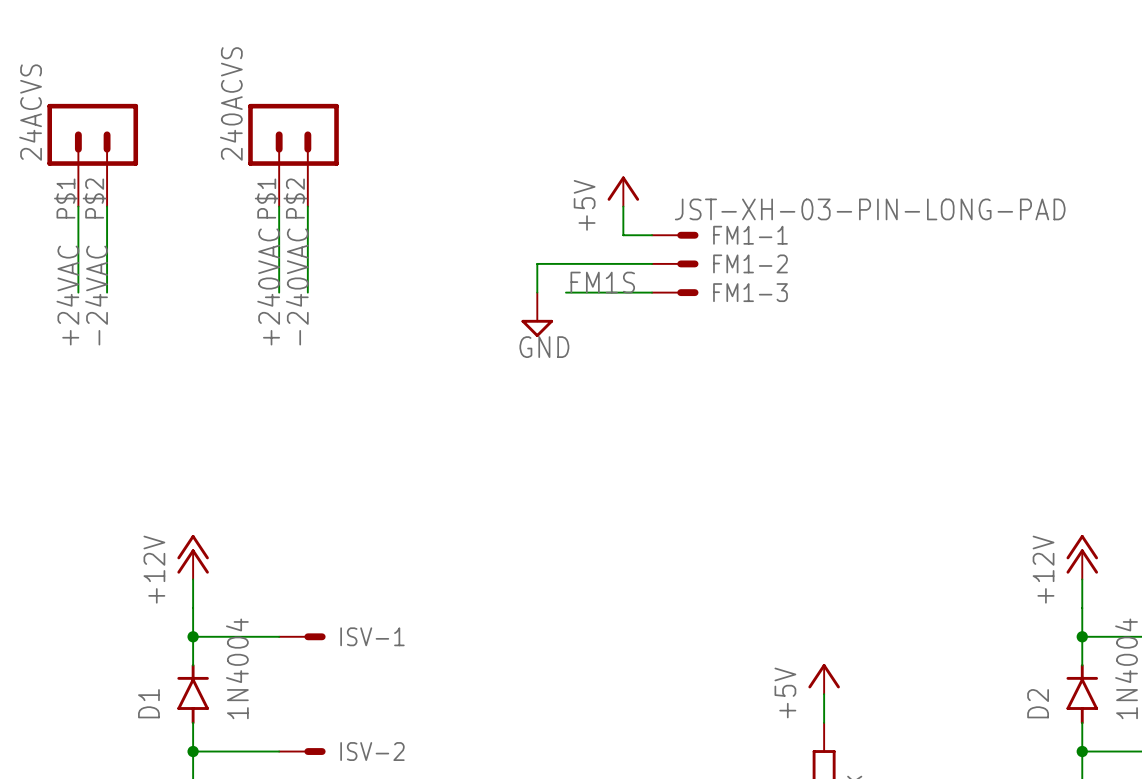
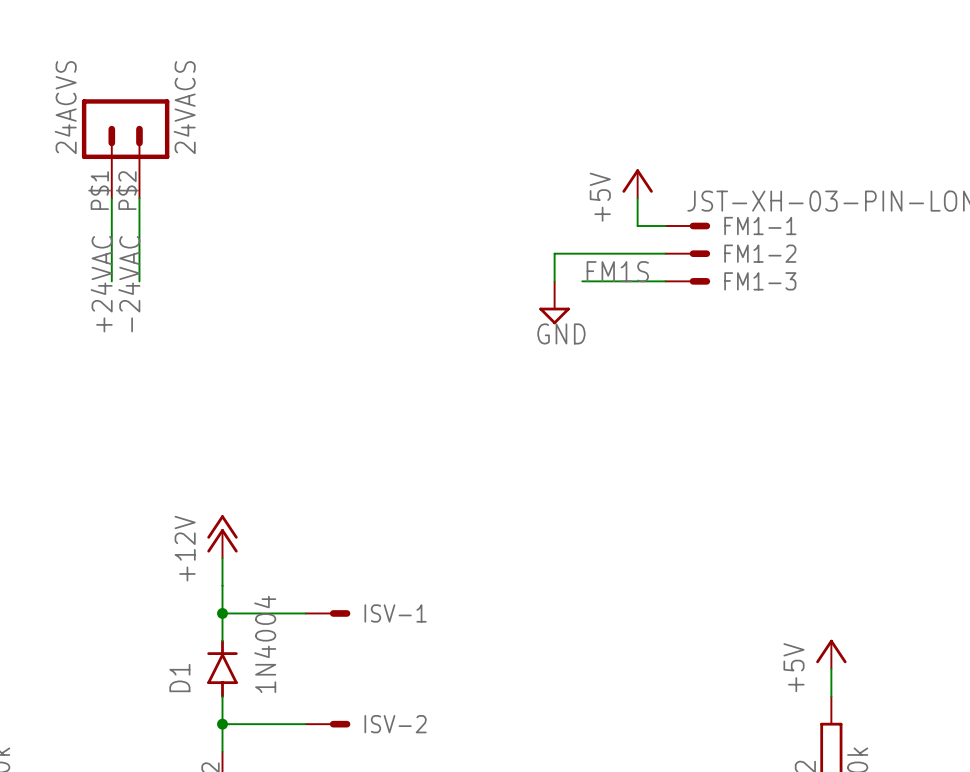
24ACVS value: none -> 24VACS (184, 107)
240ACVS: (293, 155) -> none
wire: (279, 206) (279, 292) -> none
wire: (307, 206) (307, 292) -> none
label: +240VAC (268, 286) -> none
label: -240VAC (297, 286) -> none

